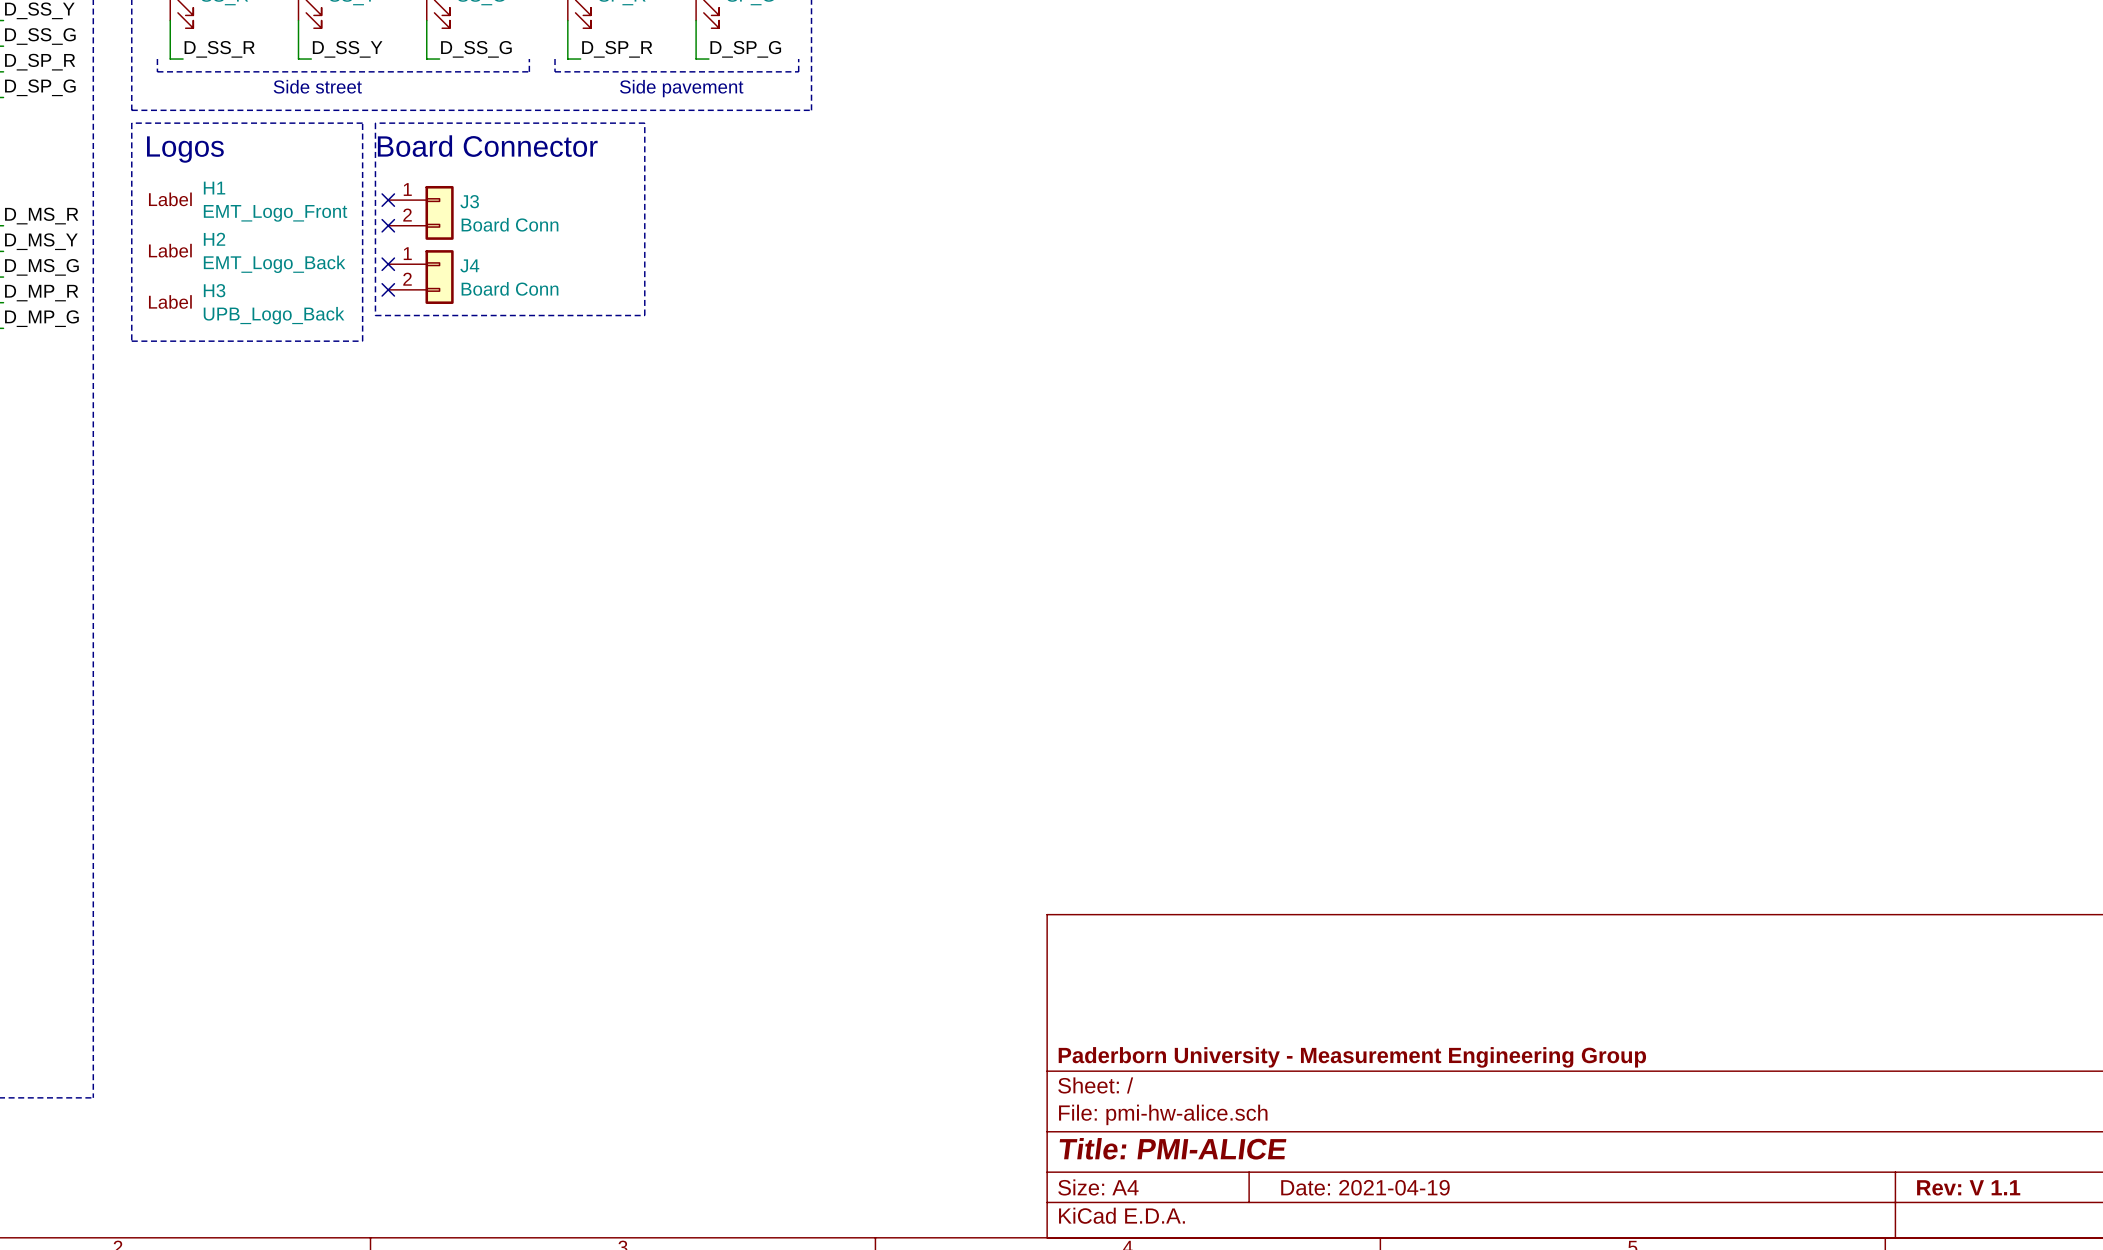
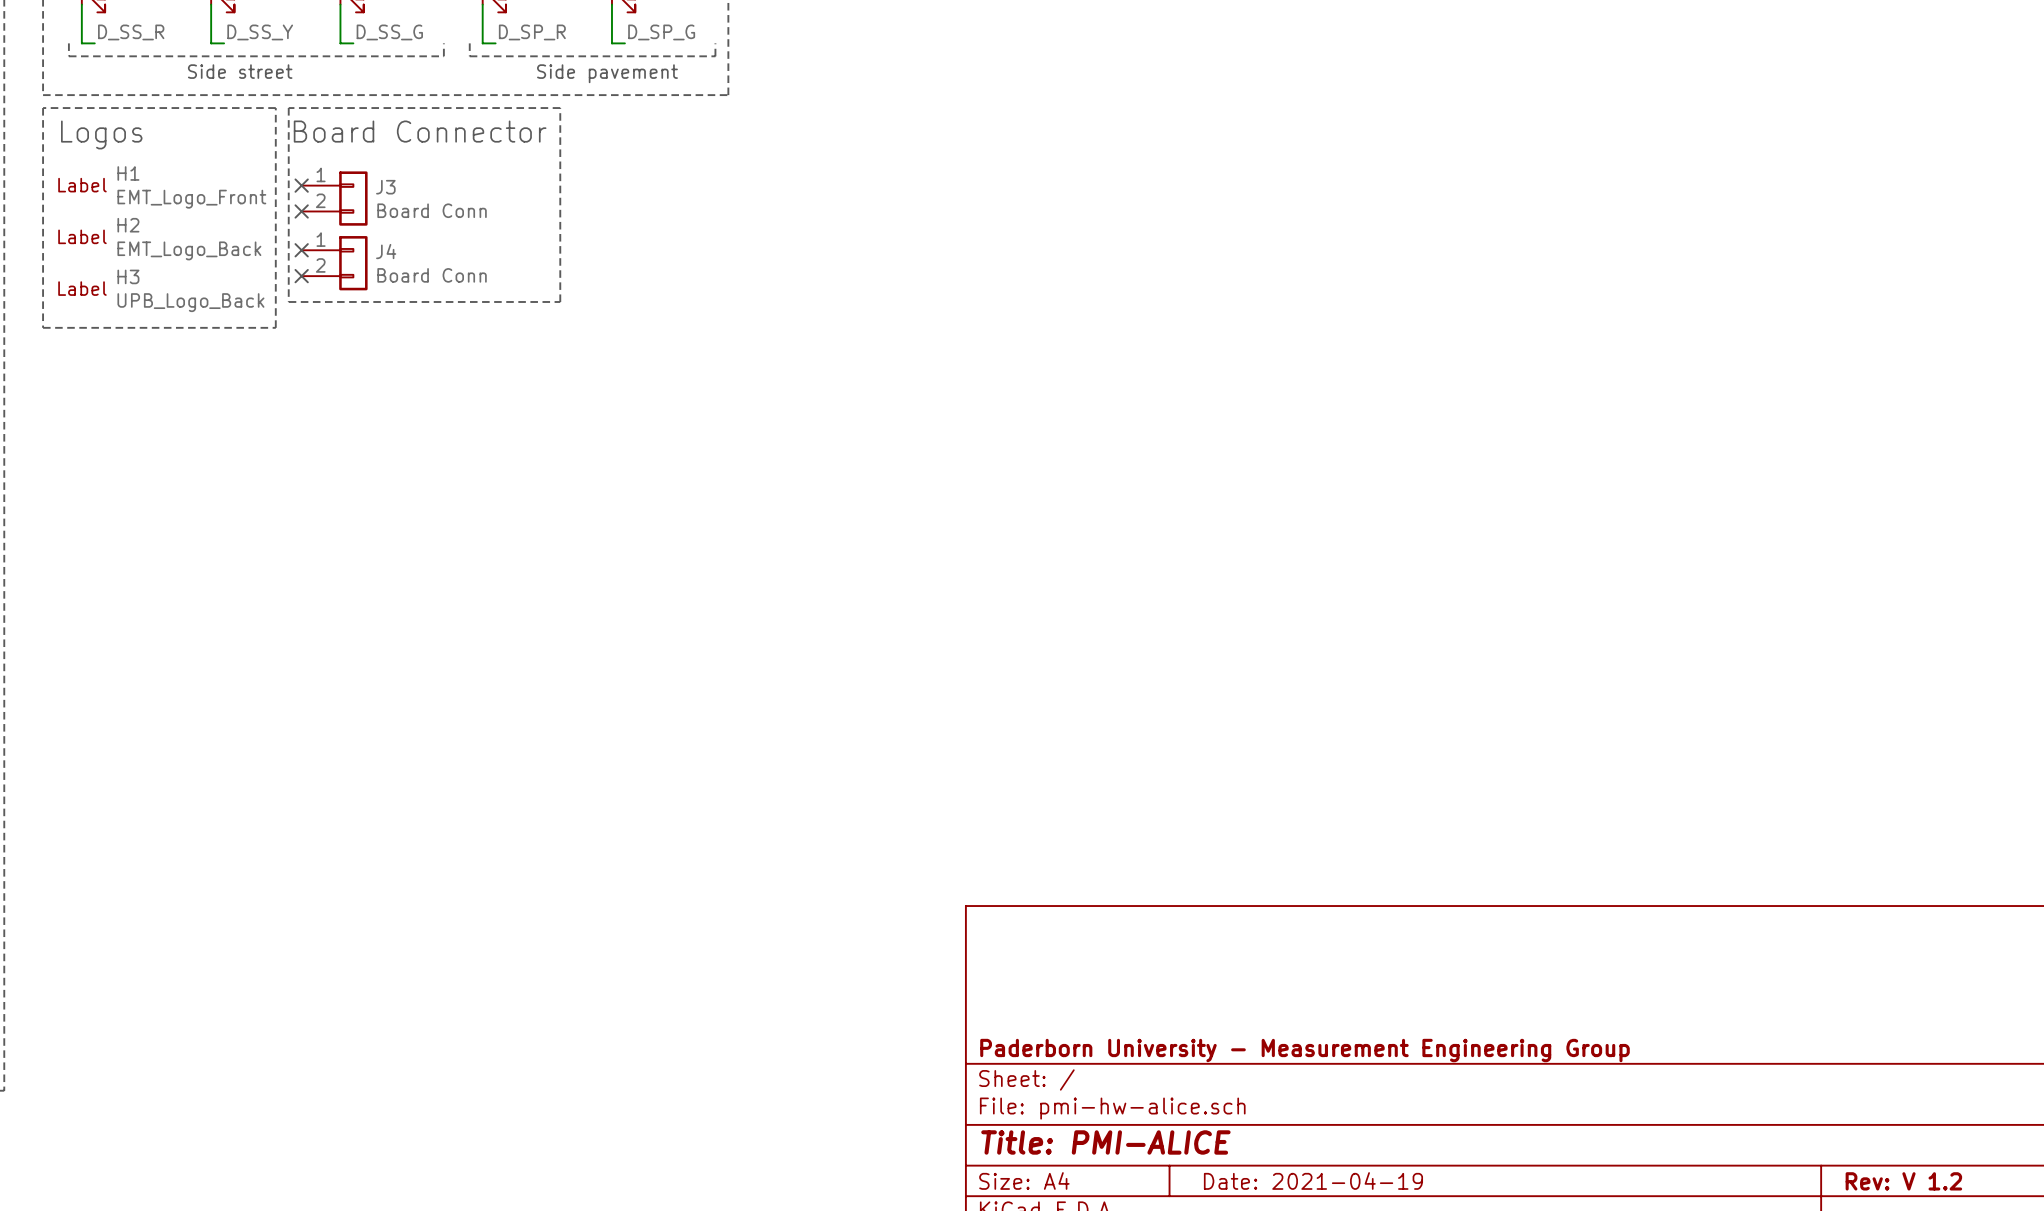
title block: Rev: V 1.1 (1968, 1187) -> Rev: V 1.2 (1903, 1181)

